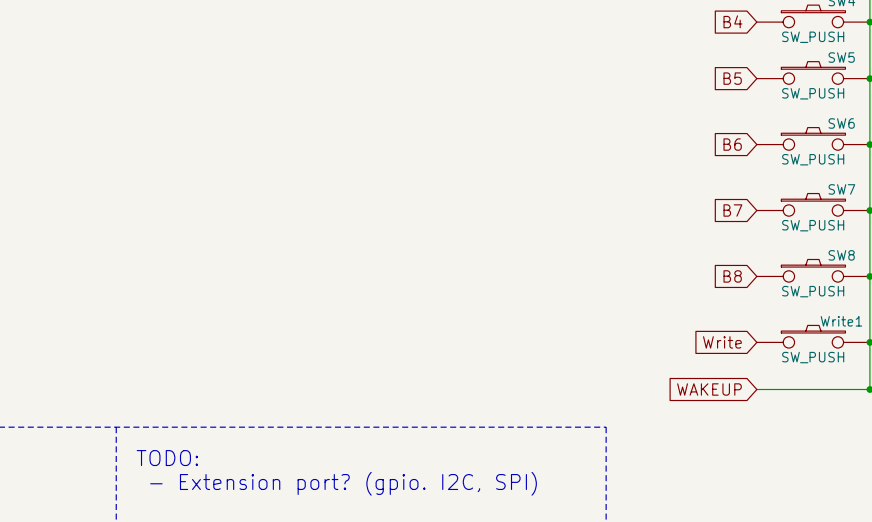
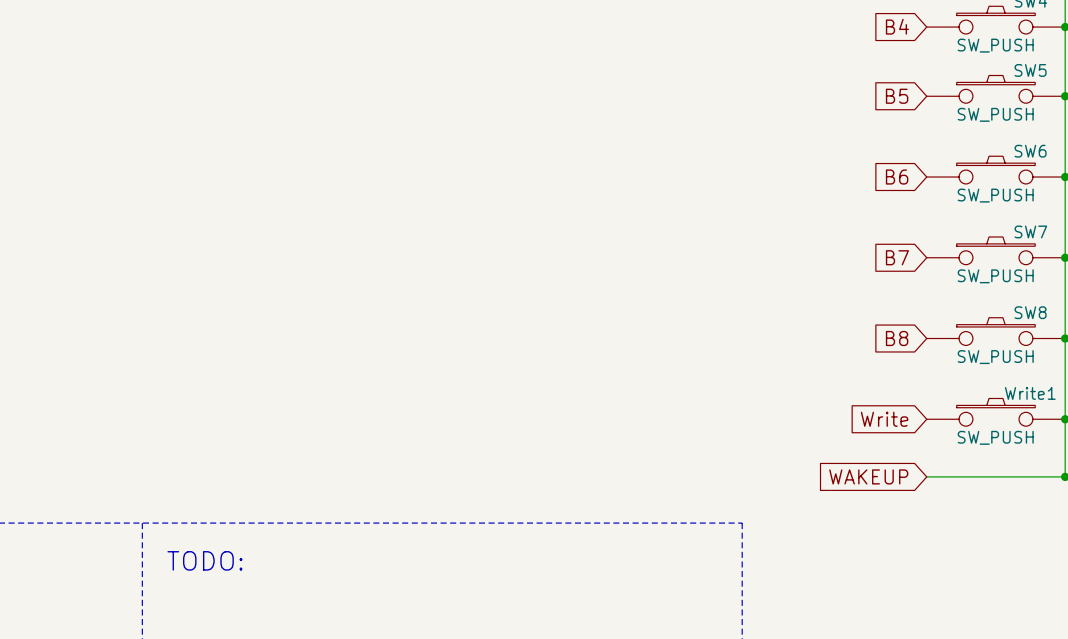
text: - Extension port? (gpio. I2C, SPI) (343, 483) -> none

